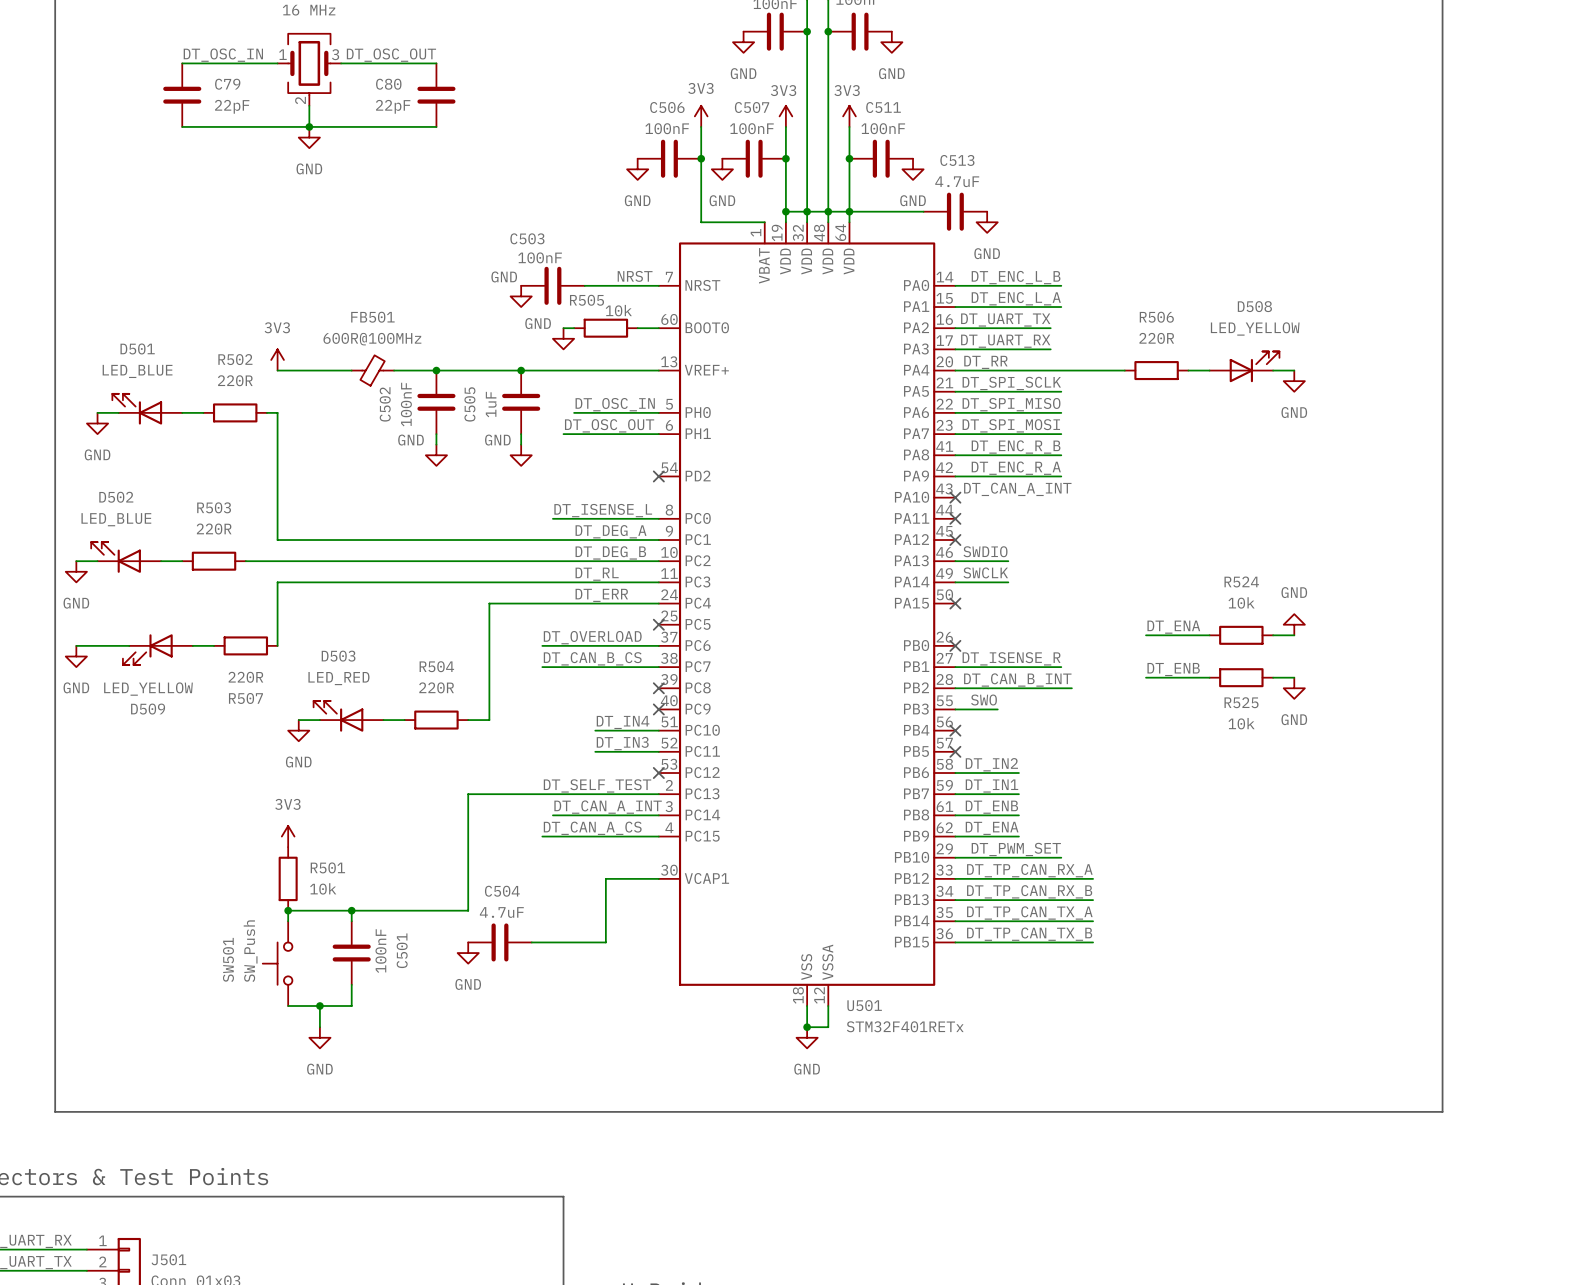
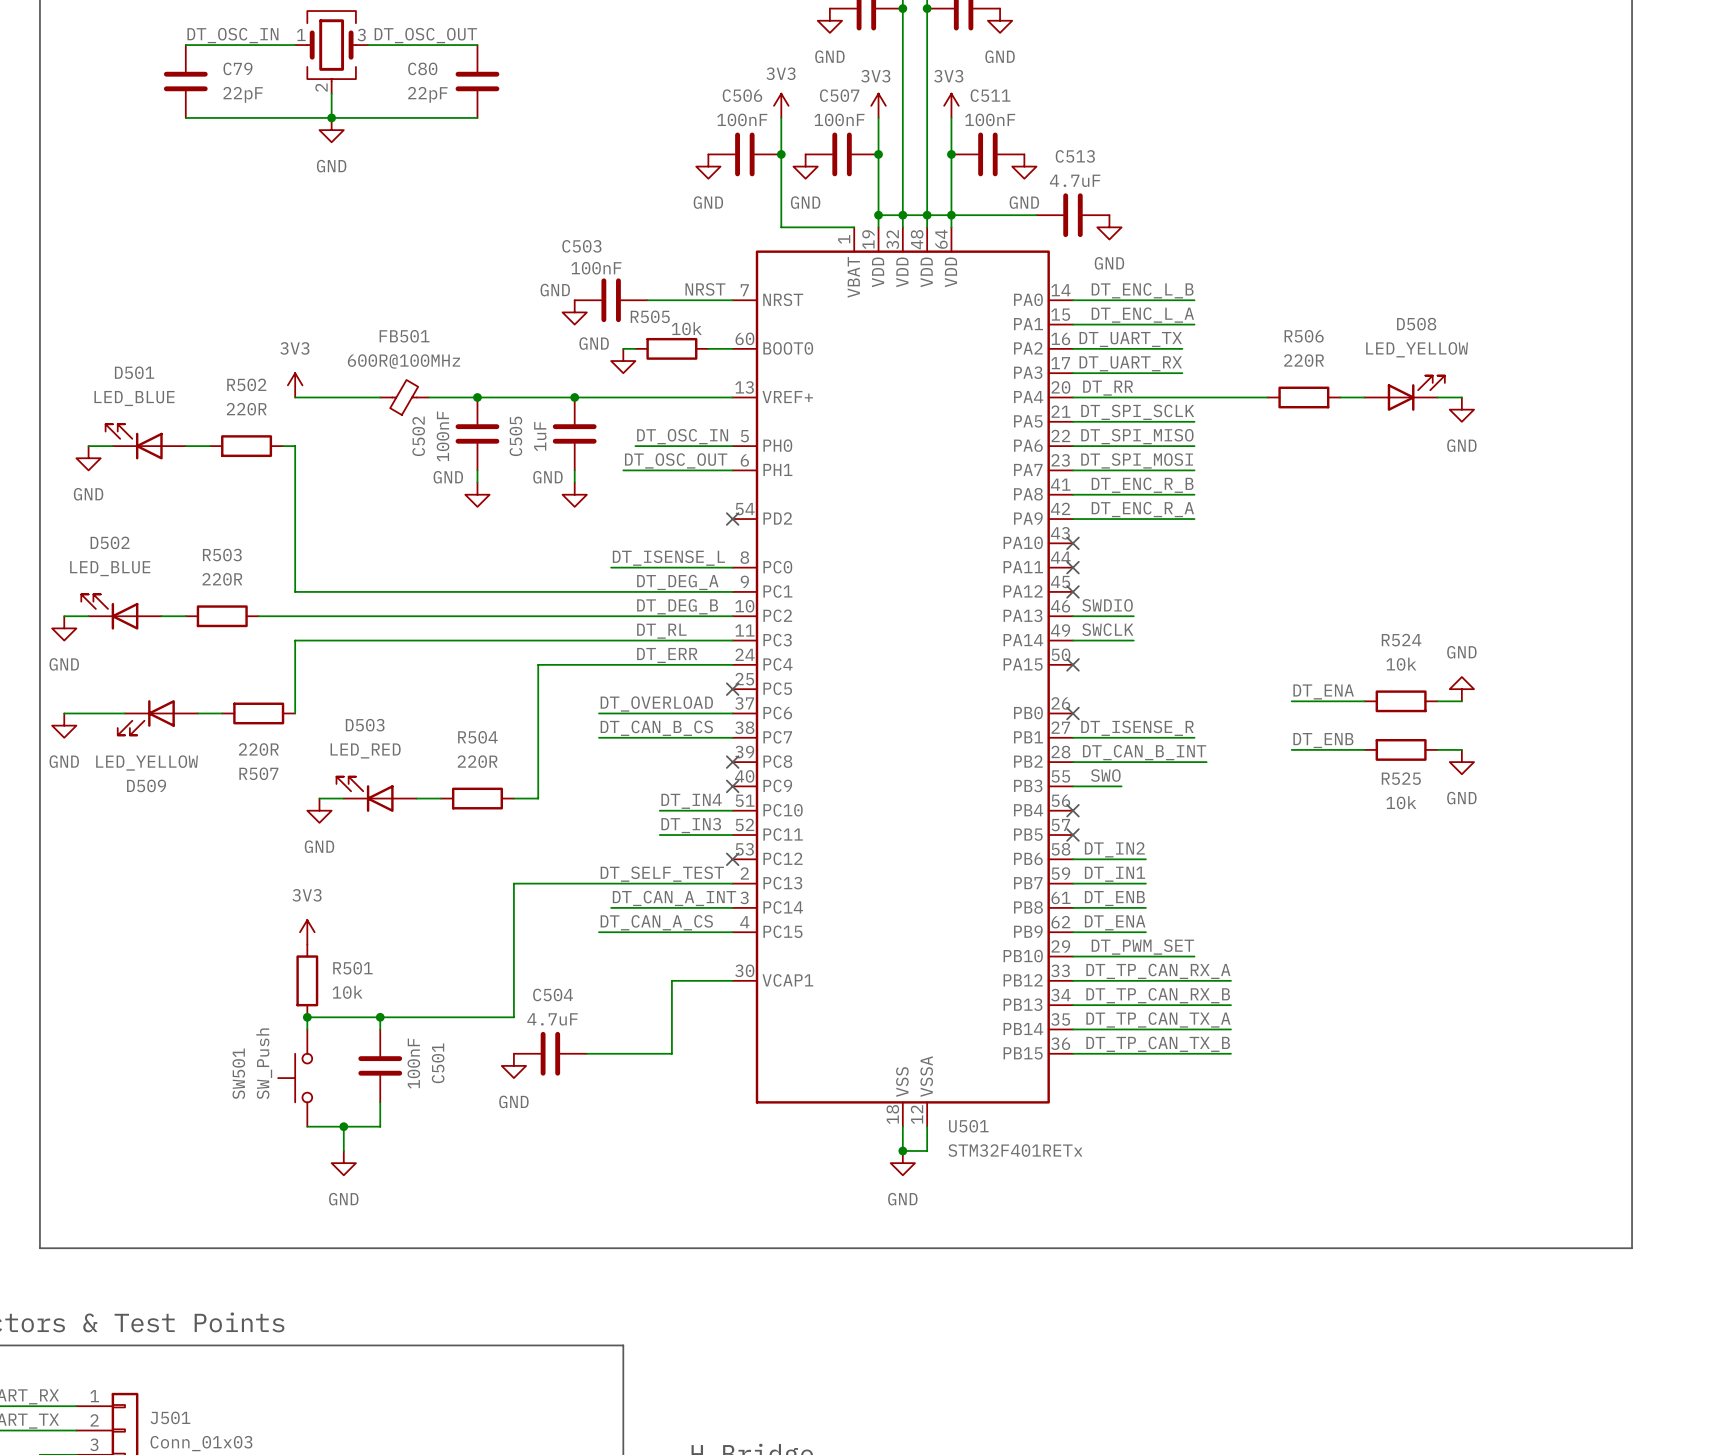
label: DT_CAN_A_INT (1017, 489) -> none

